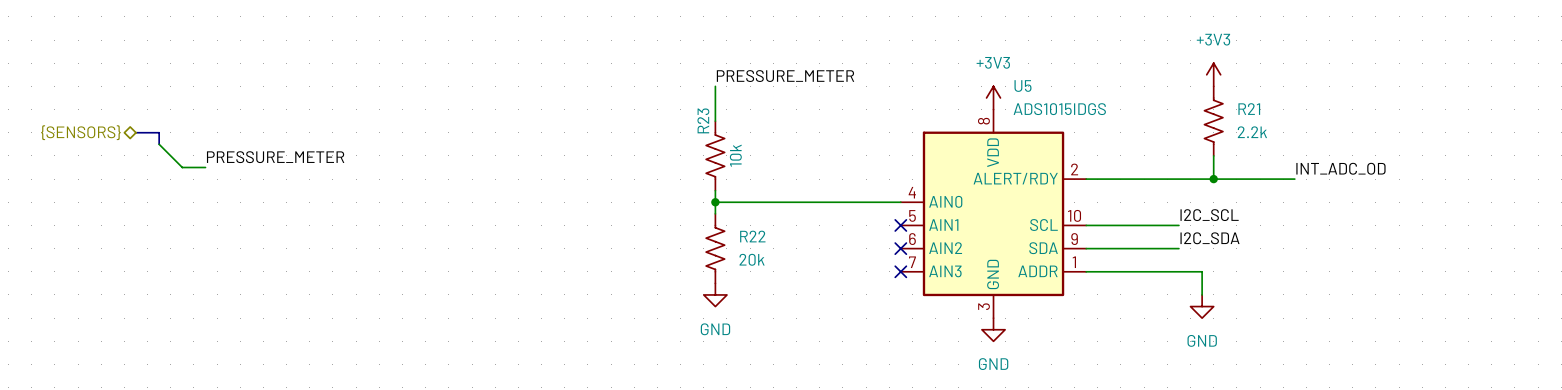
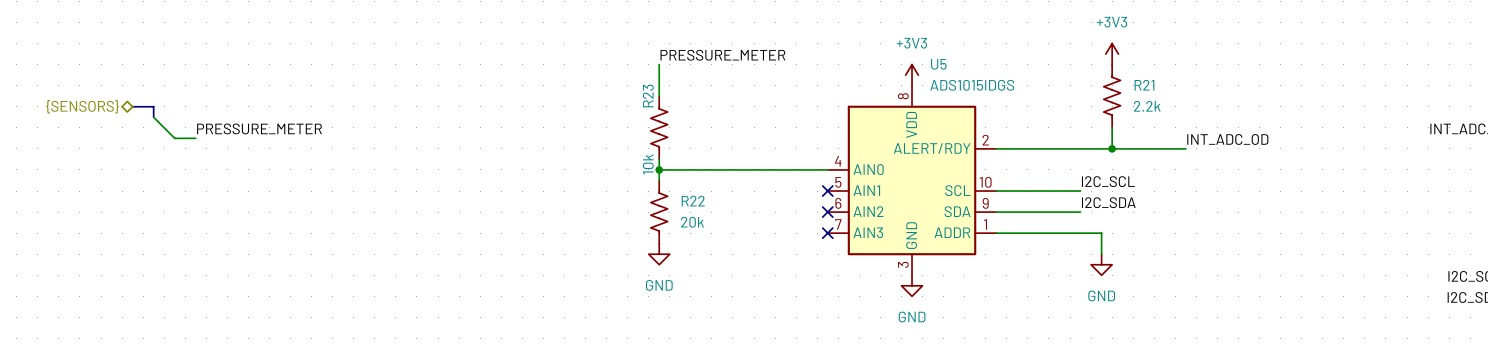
R23 value position: 10k (735, 155) -> 10k (648, 164)

